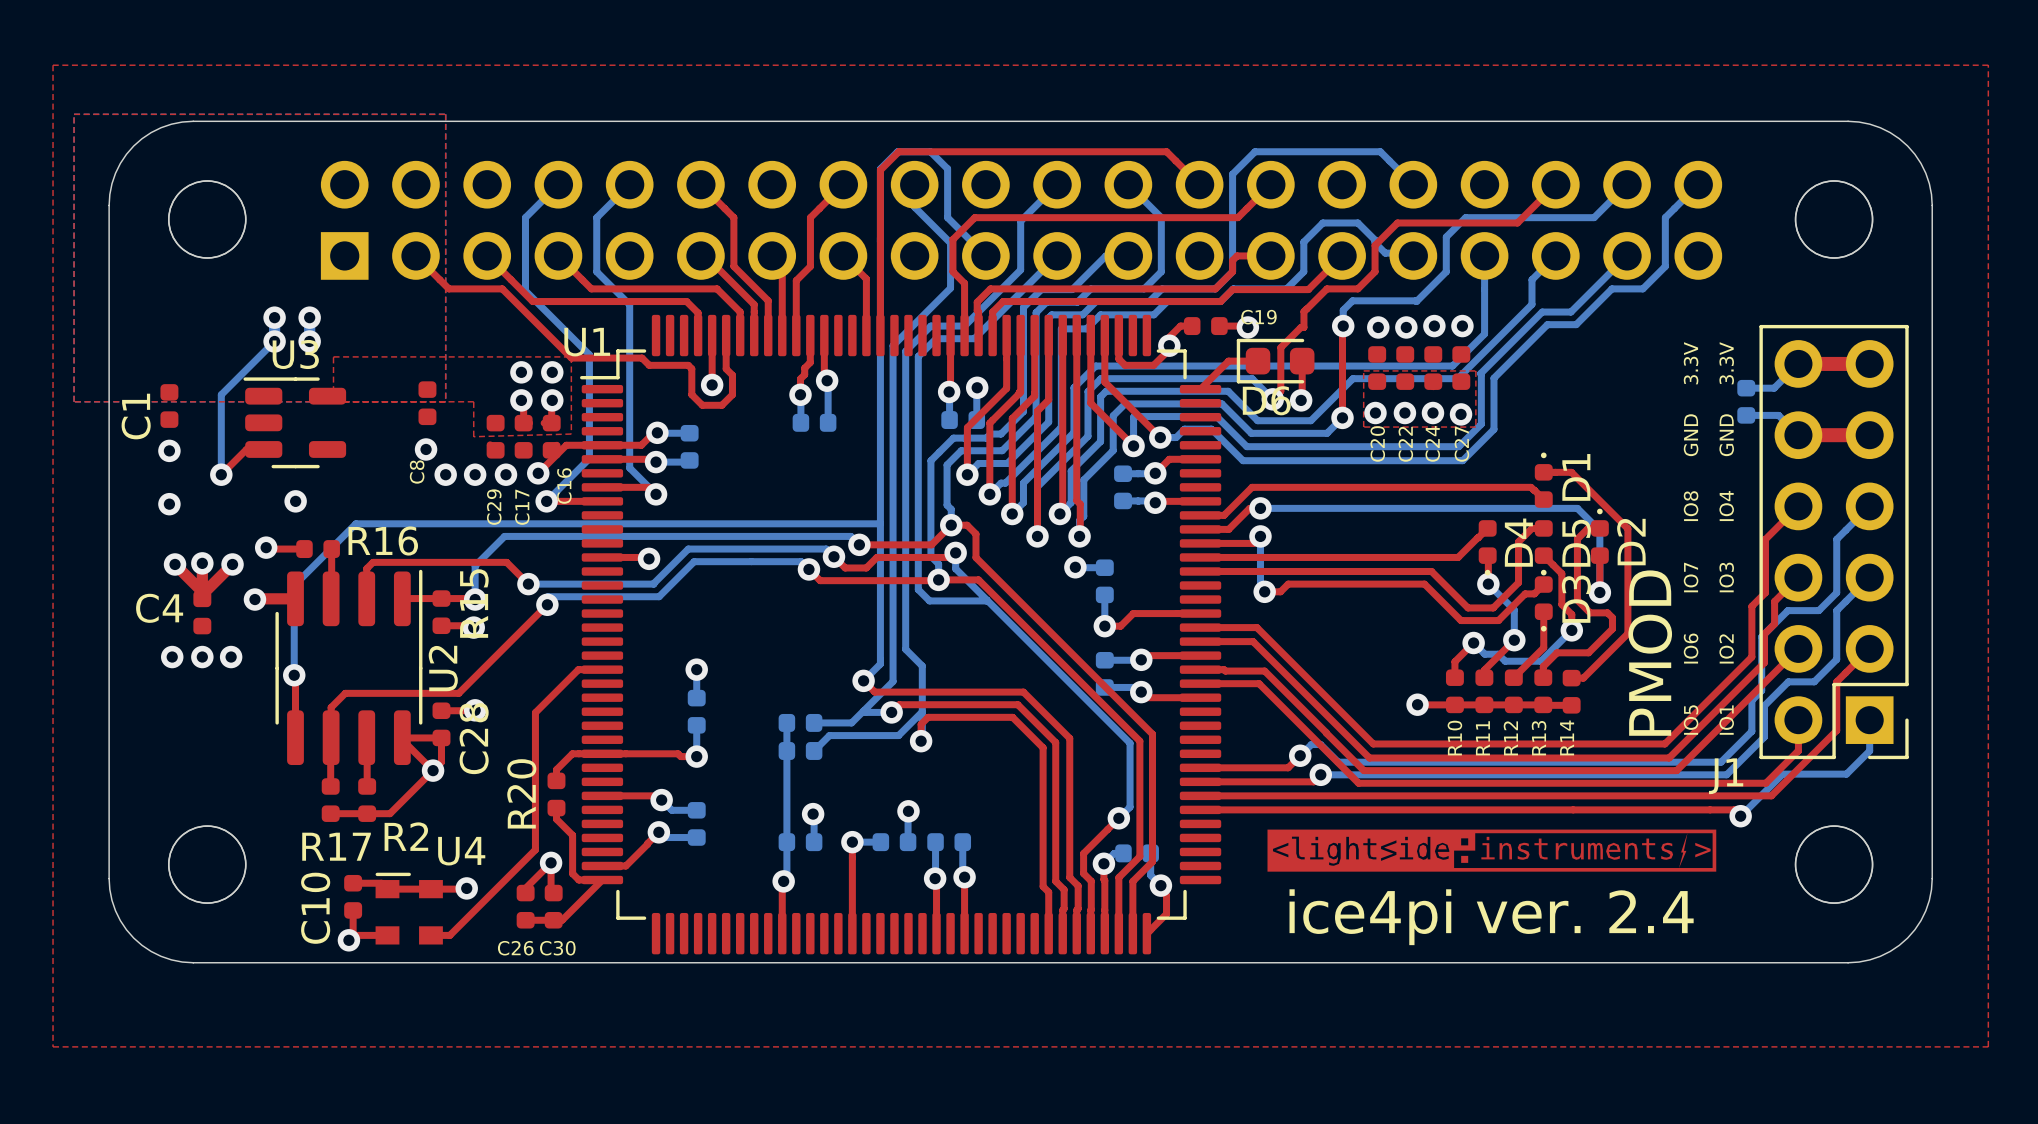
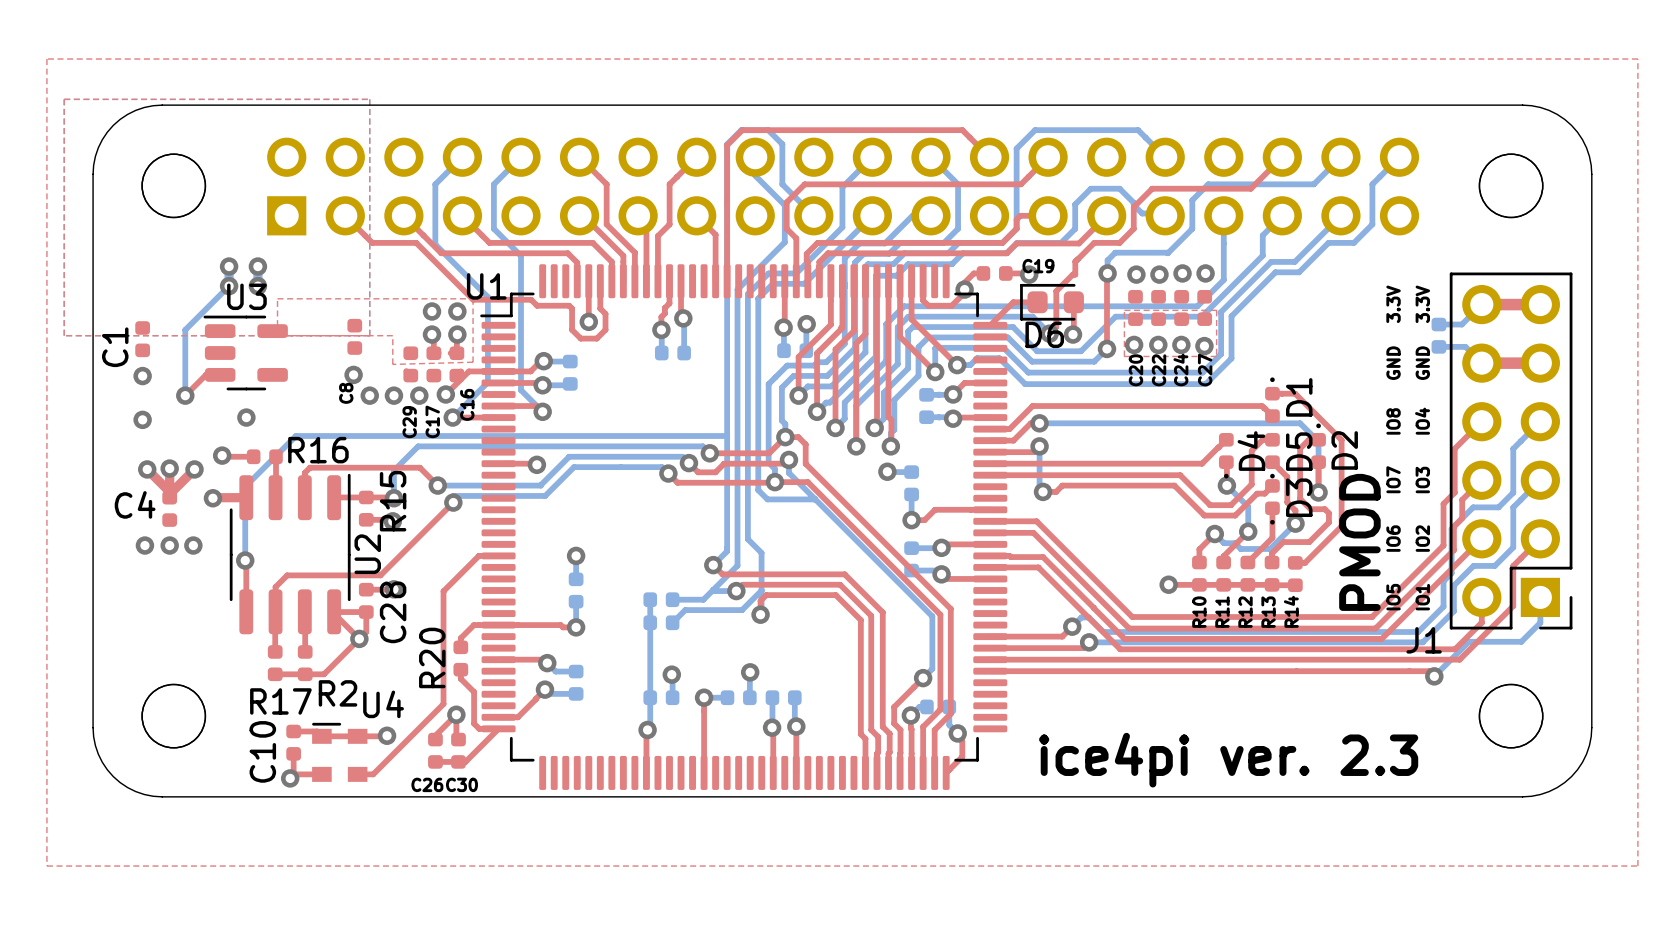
drawing: [1267, 829, 1717, 872] -> none
text: ice4pi ver. 2.4 (1491, 917) -> ice4pi ver. 2.3 (1228, 760)

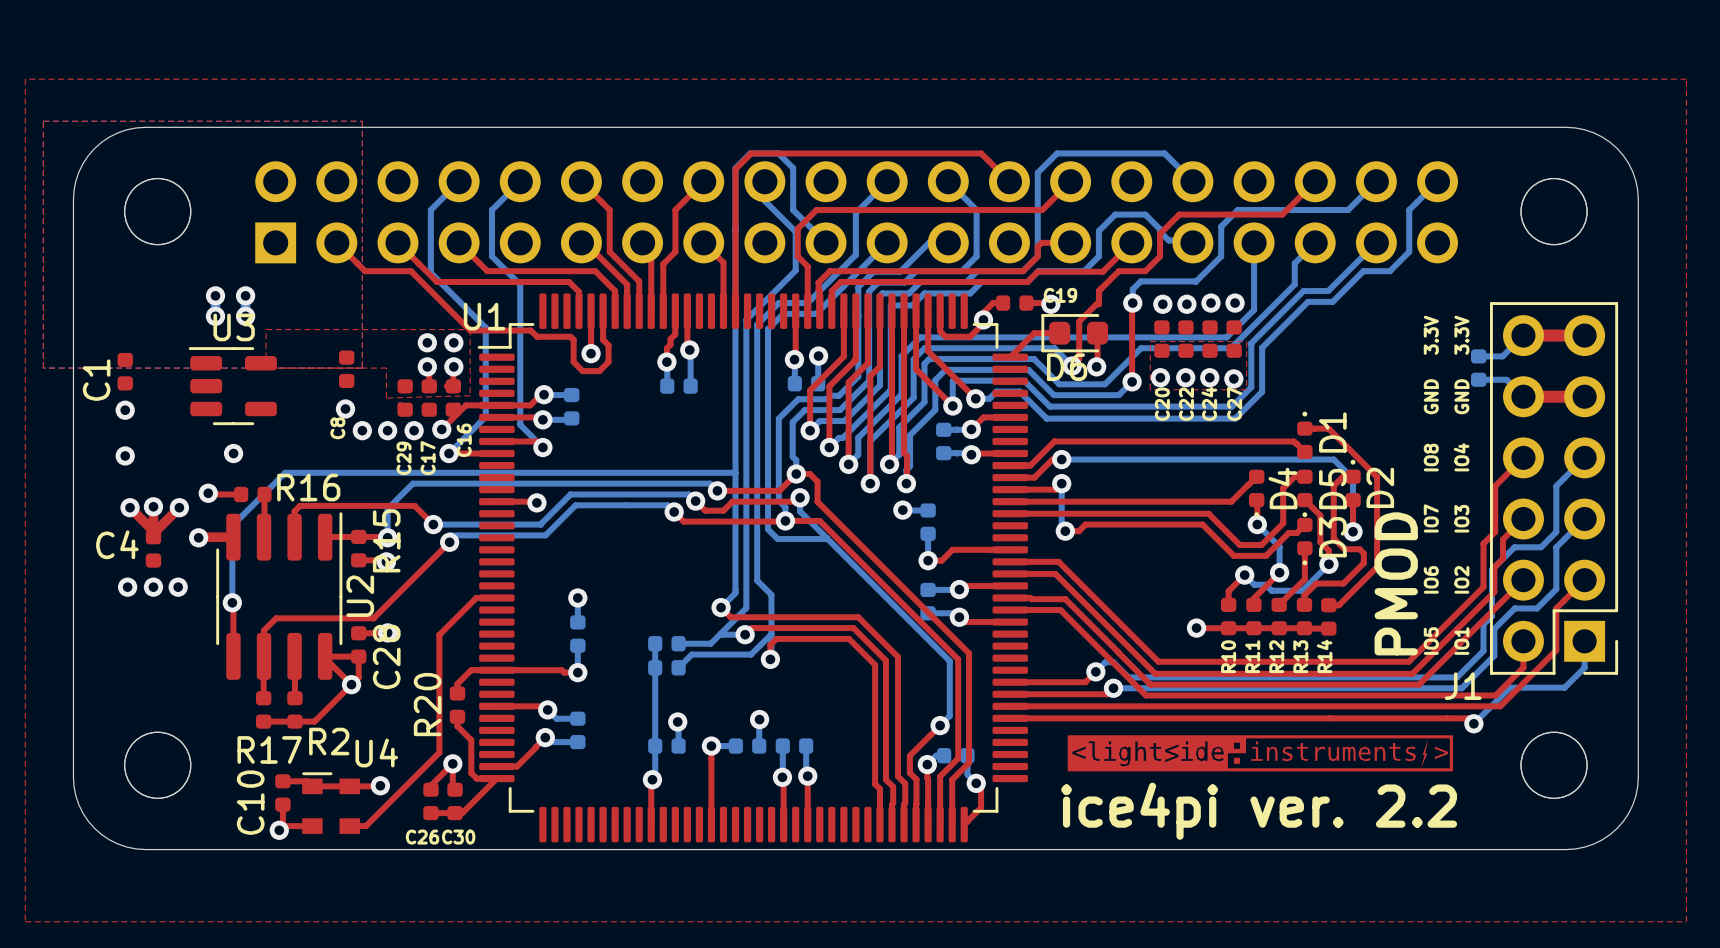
bottom track: (229, 286) (185, 329) (185, 395) -> none
top track: (220, 374) (206, 374) (185, 395) -> none
via: (185, 395) -> none
drawing: none -> [1067, 735, 1453, 772]
text: ice4pi ver. 2.3 (1228, 760) -> ice4pi ver. 2.2 (1259, 811)

